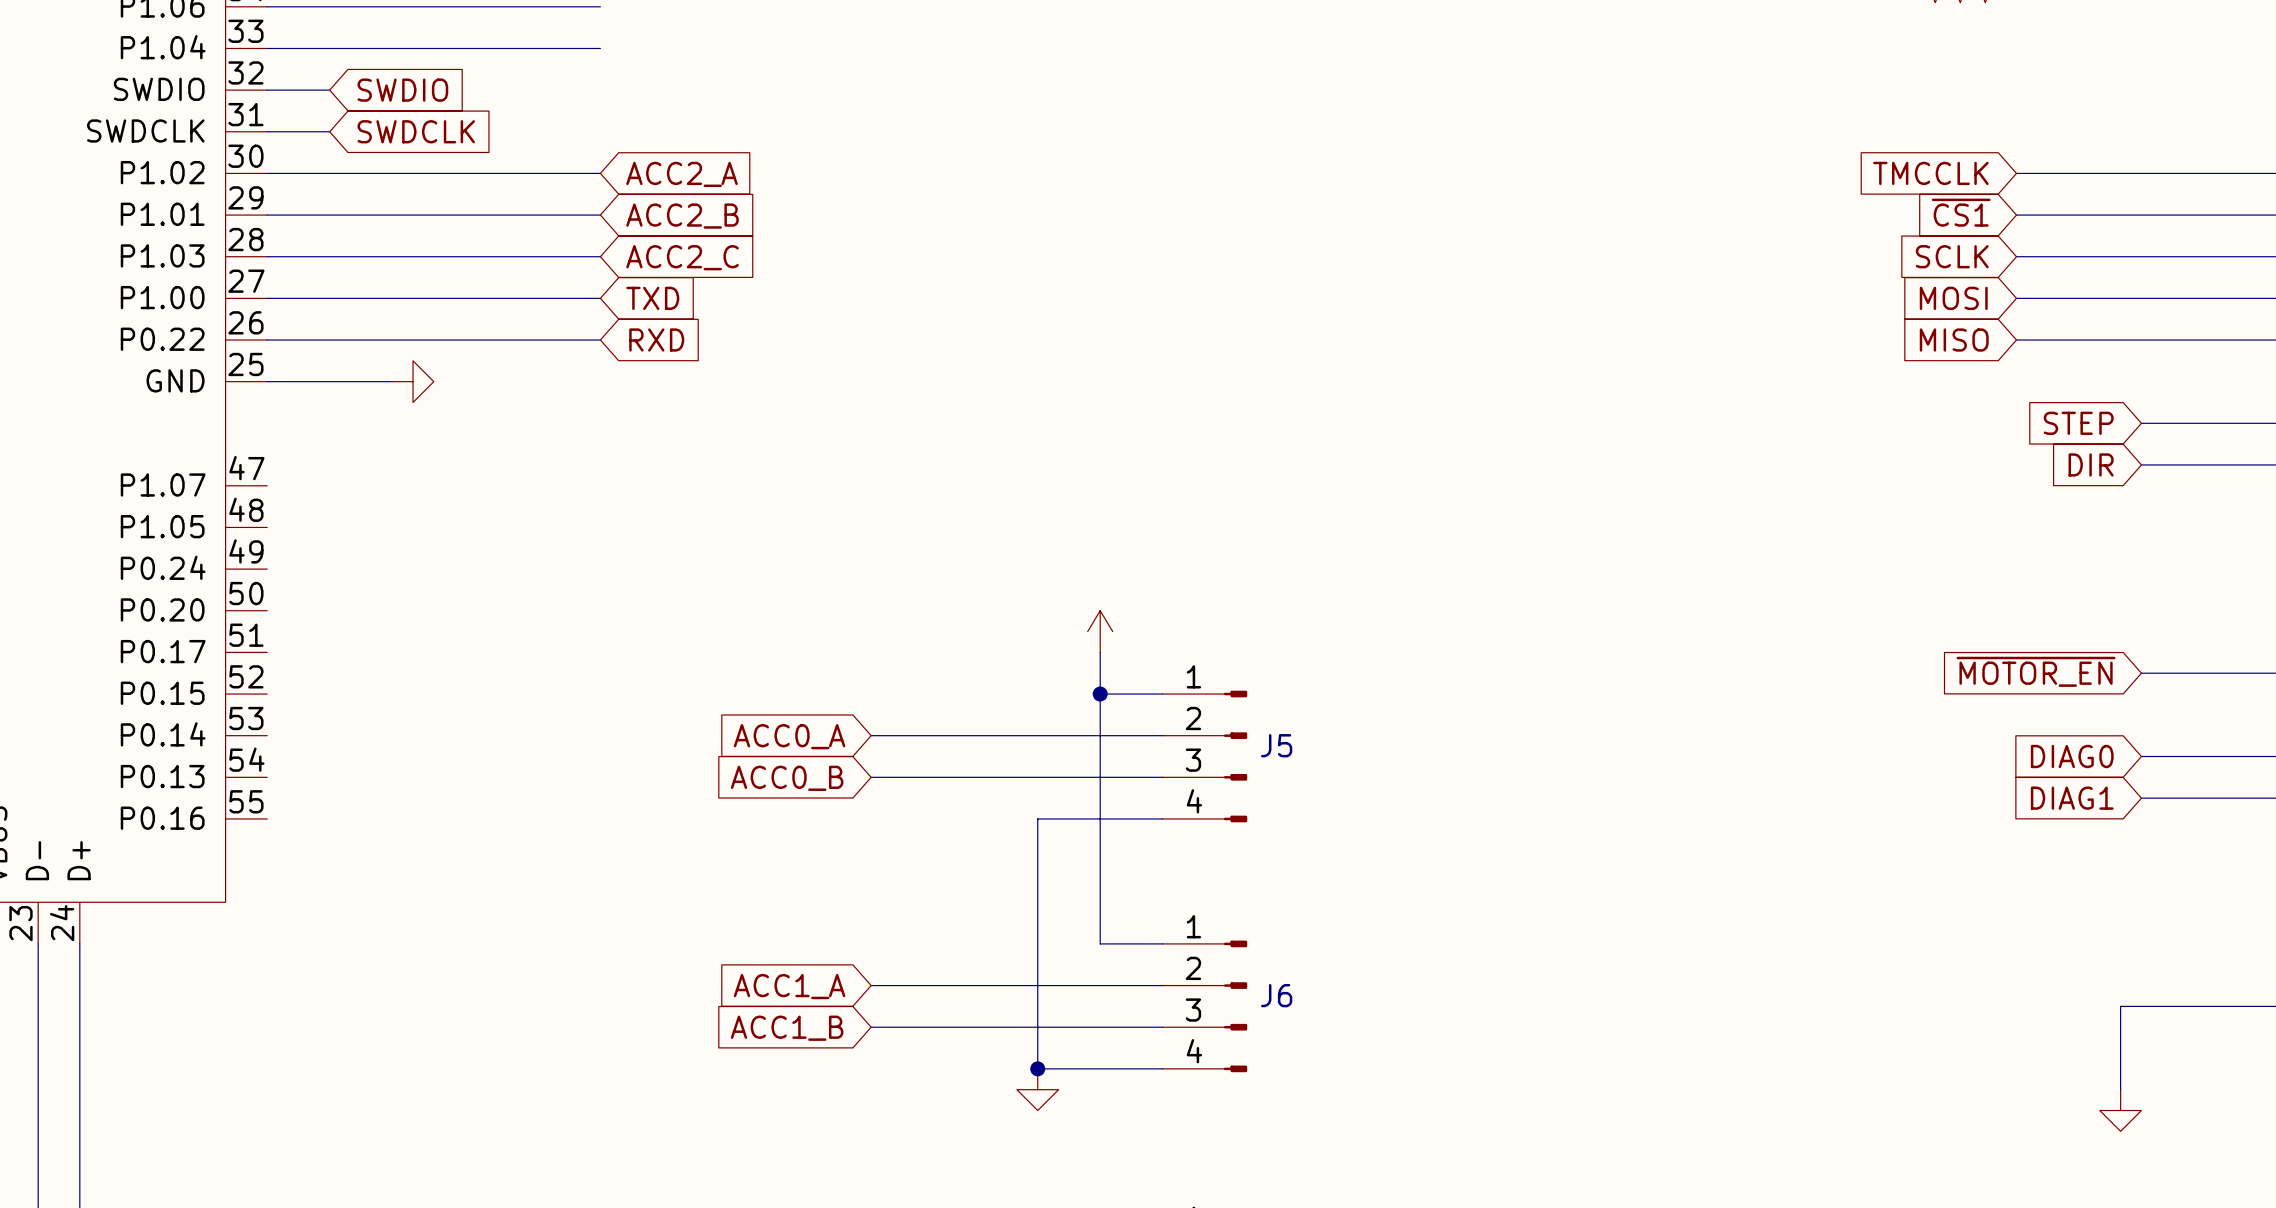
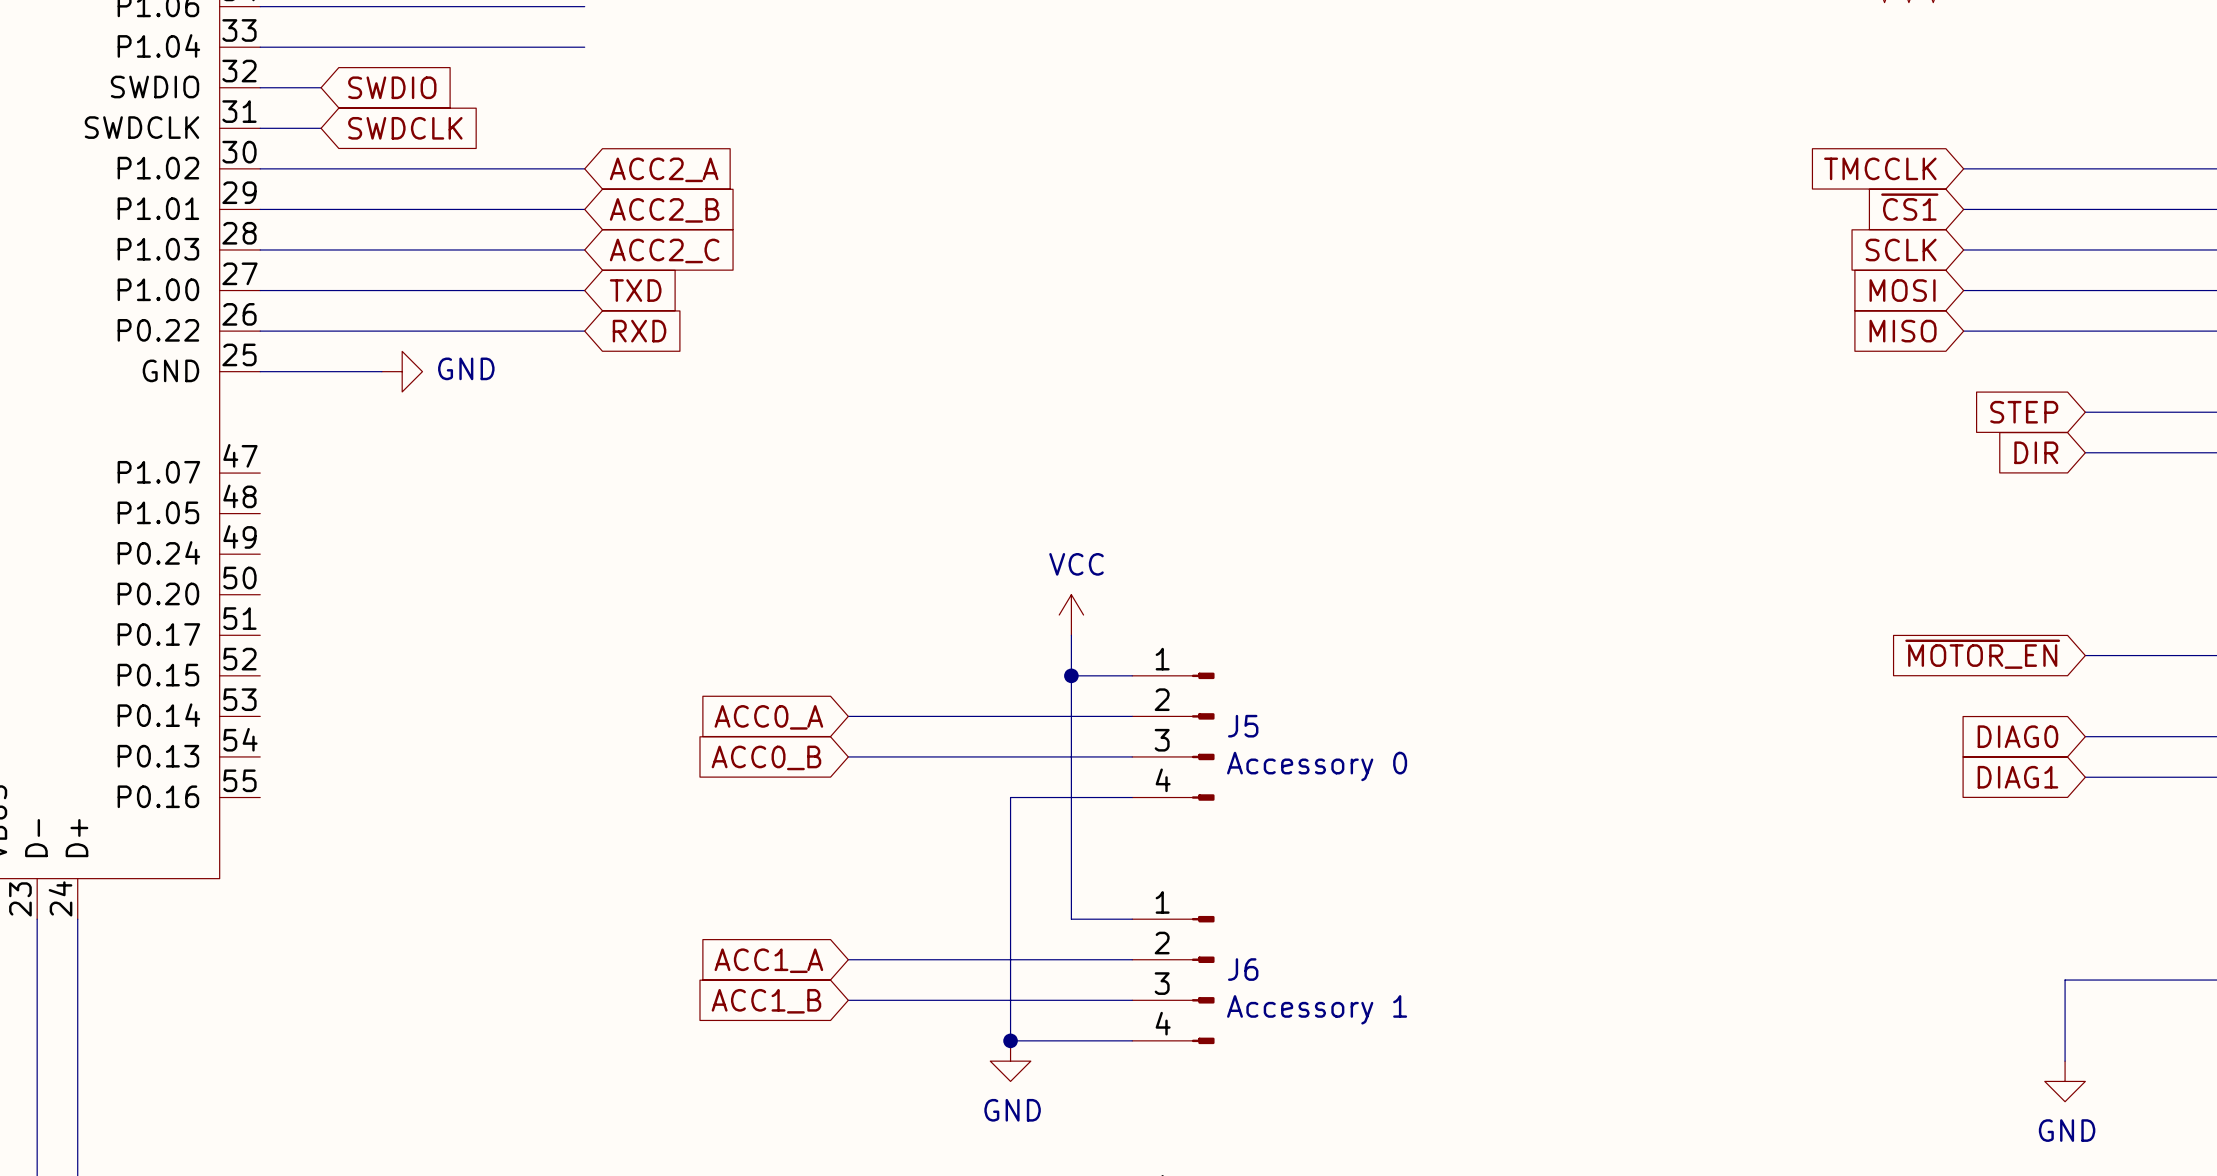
power symbol text: none -> GND (466, 368)
power symbol text: none -> VCC (1076, 564)
J5 value: none -> Accessory 0 (1317, 766)
J6 value: none -> Accessory 1 (1317, 1009)
power symbol text: none -> GND (1012, 1110)
power symbol text: none -> GND (2067, 1130)

